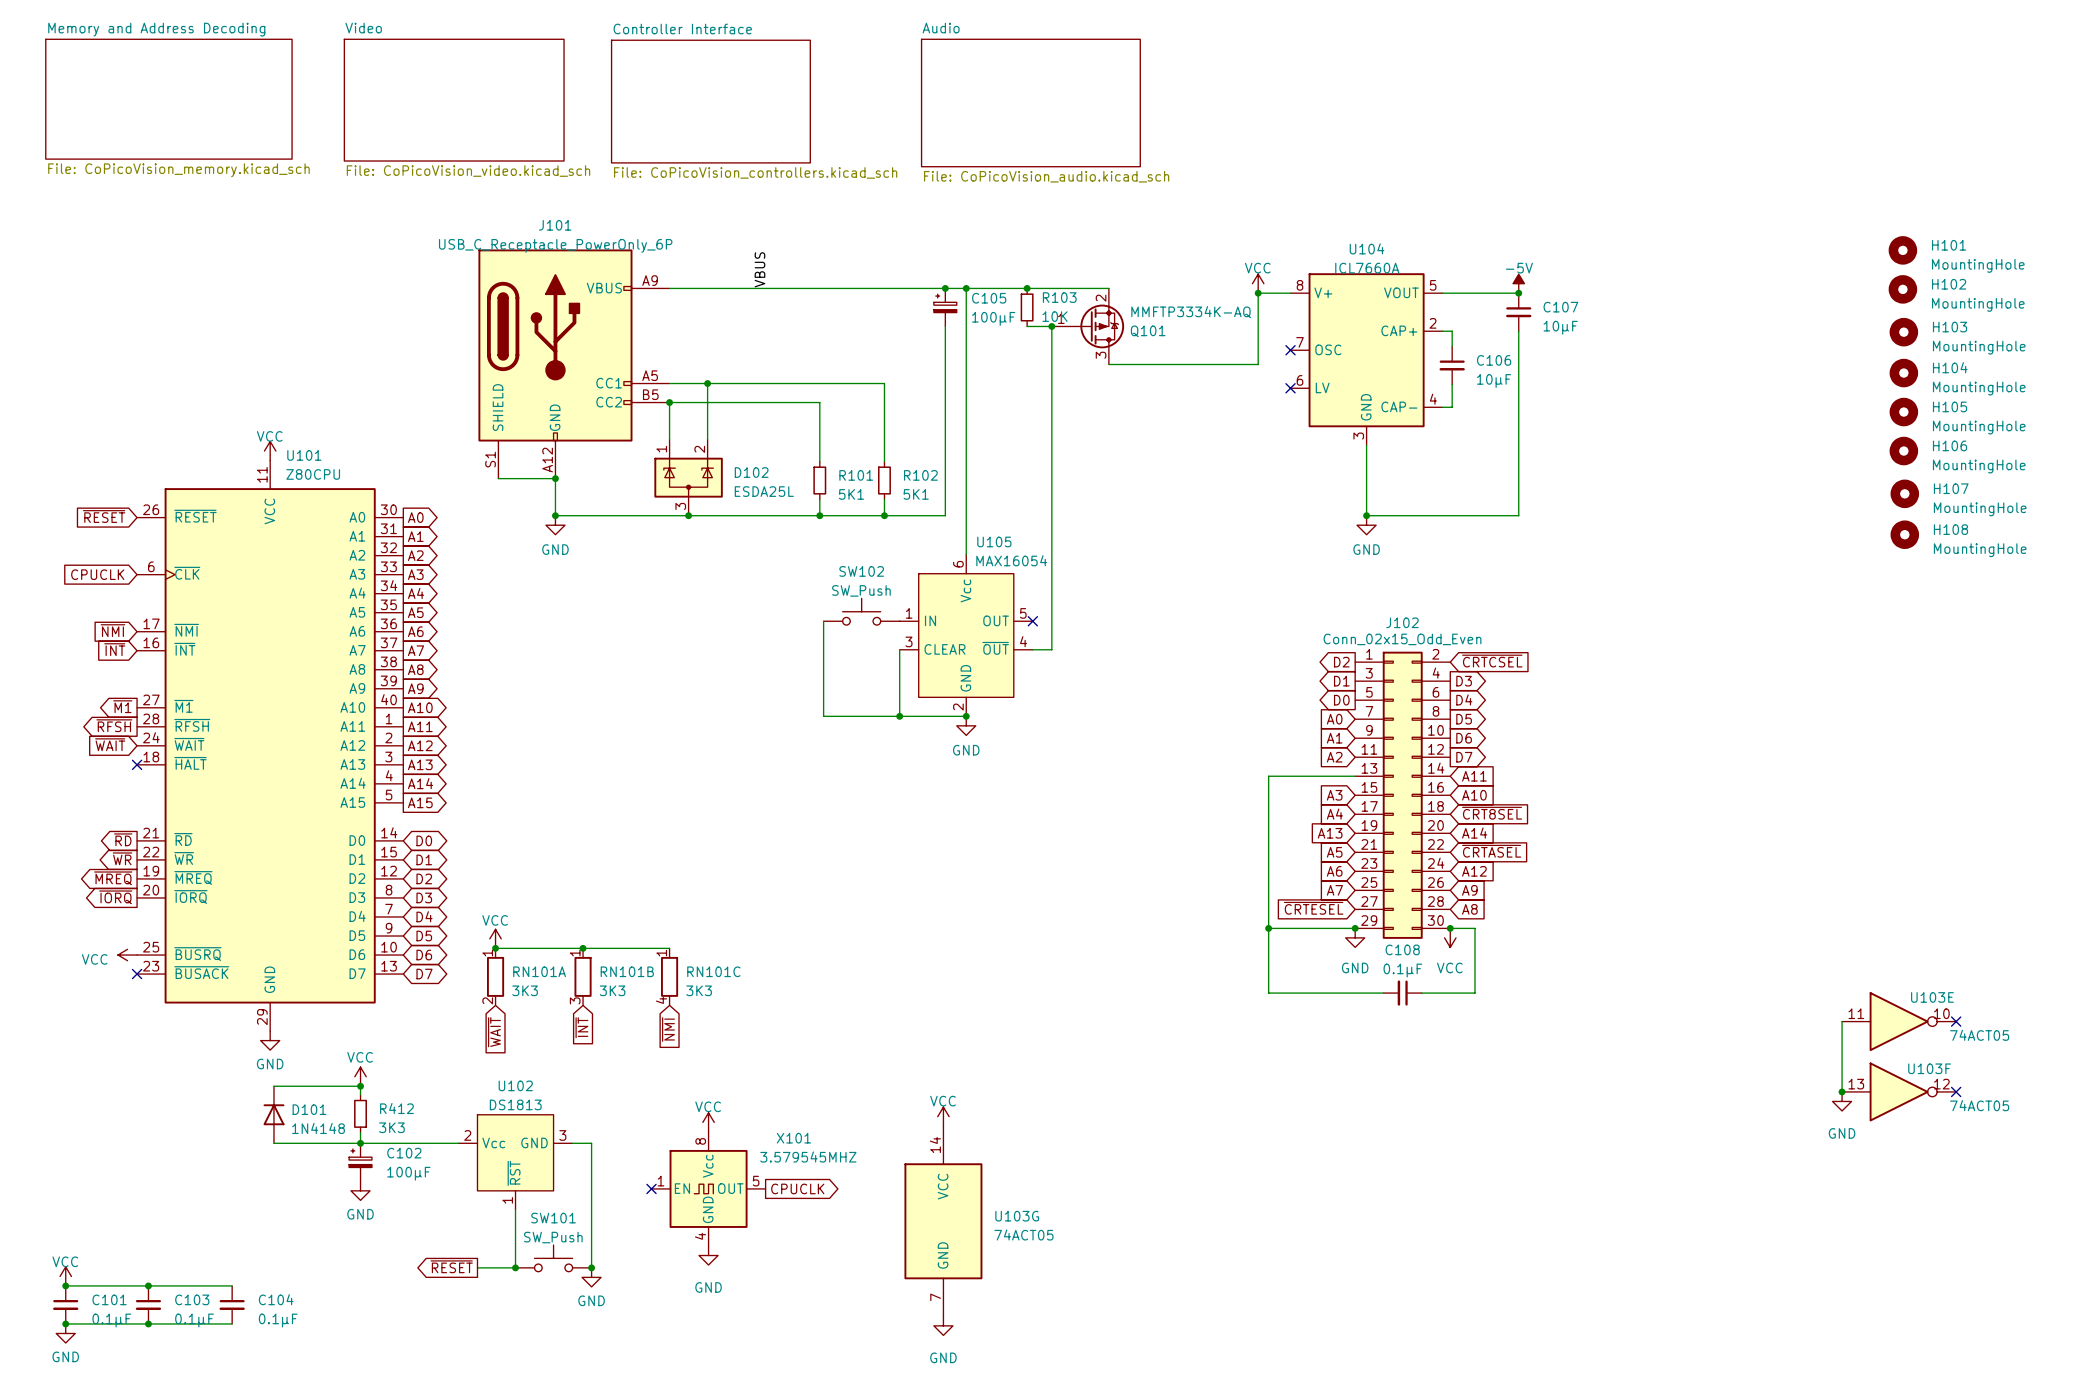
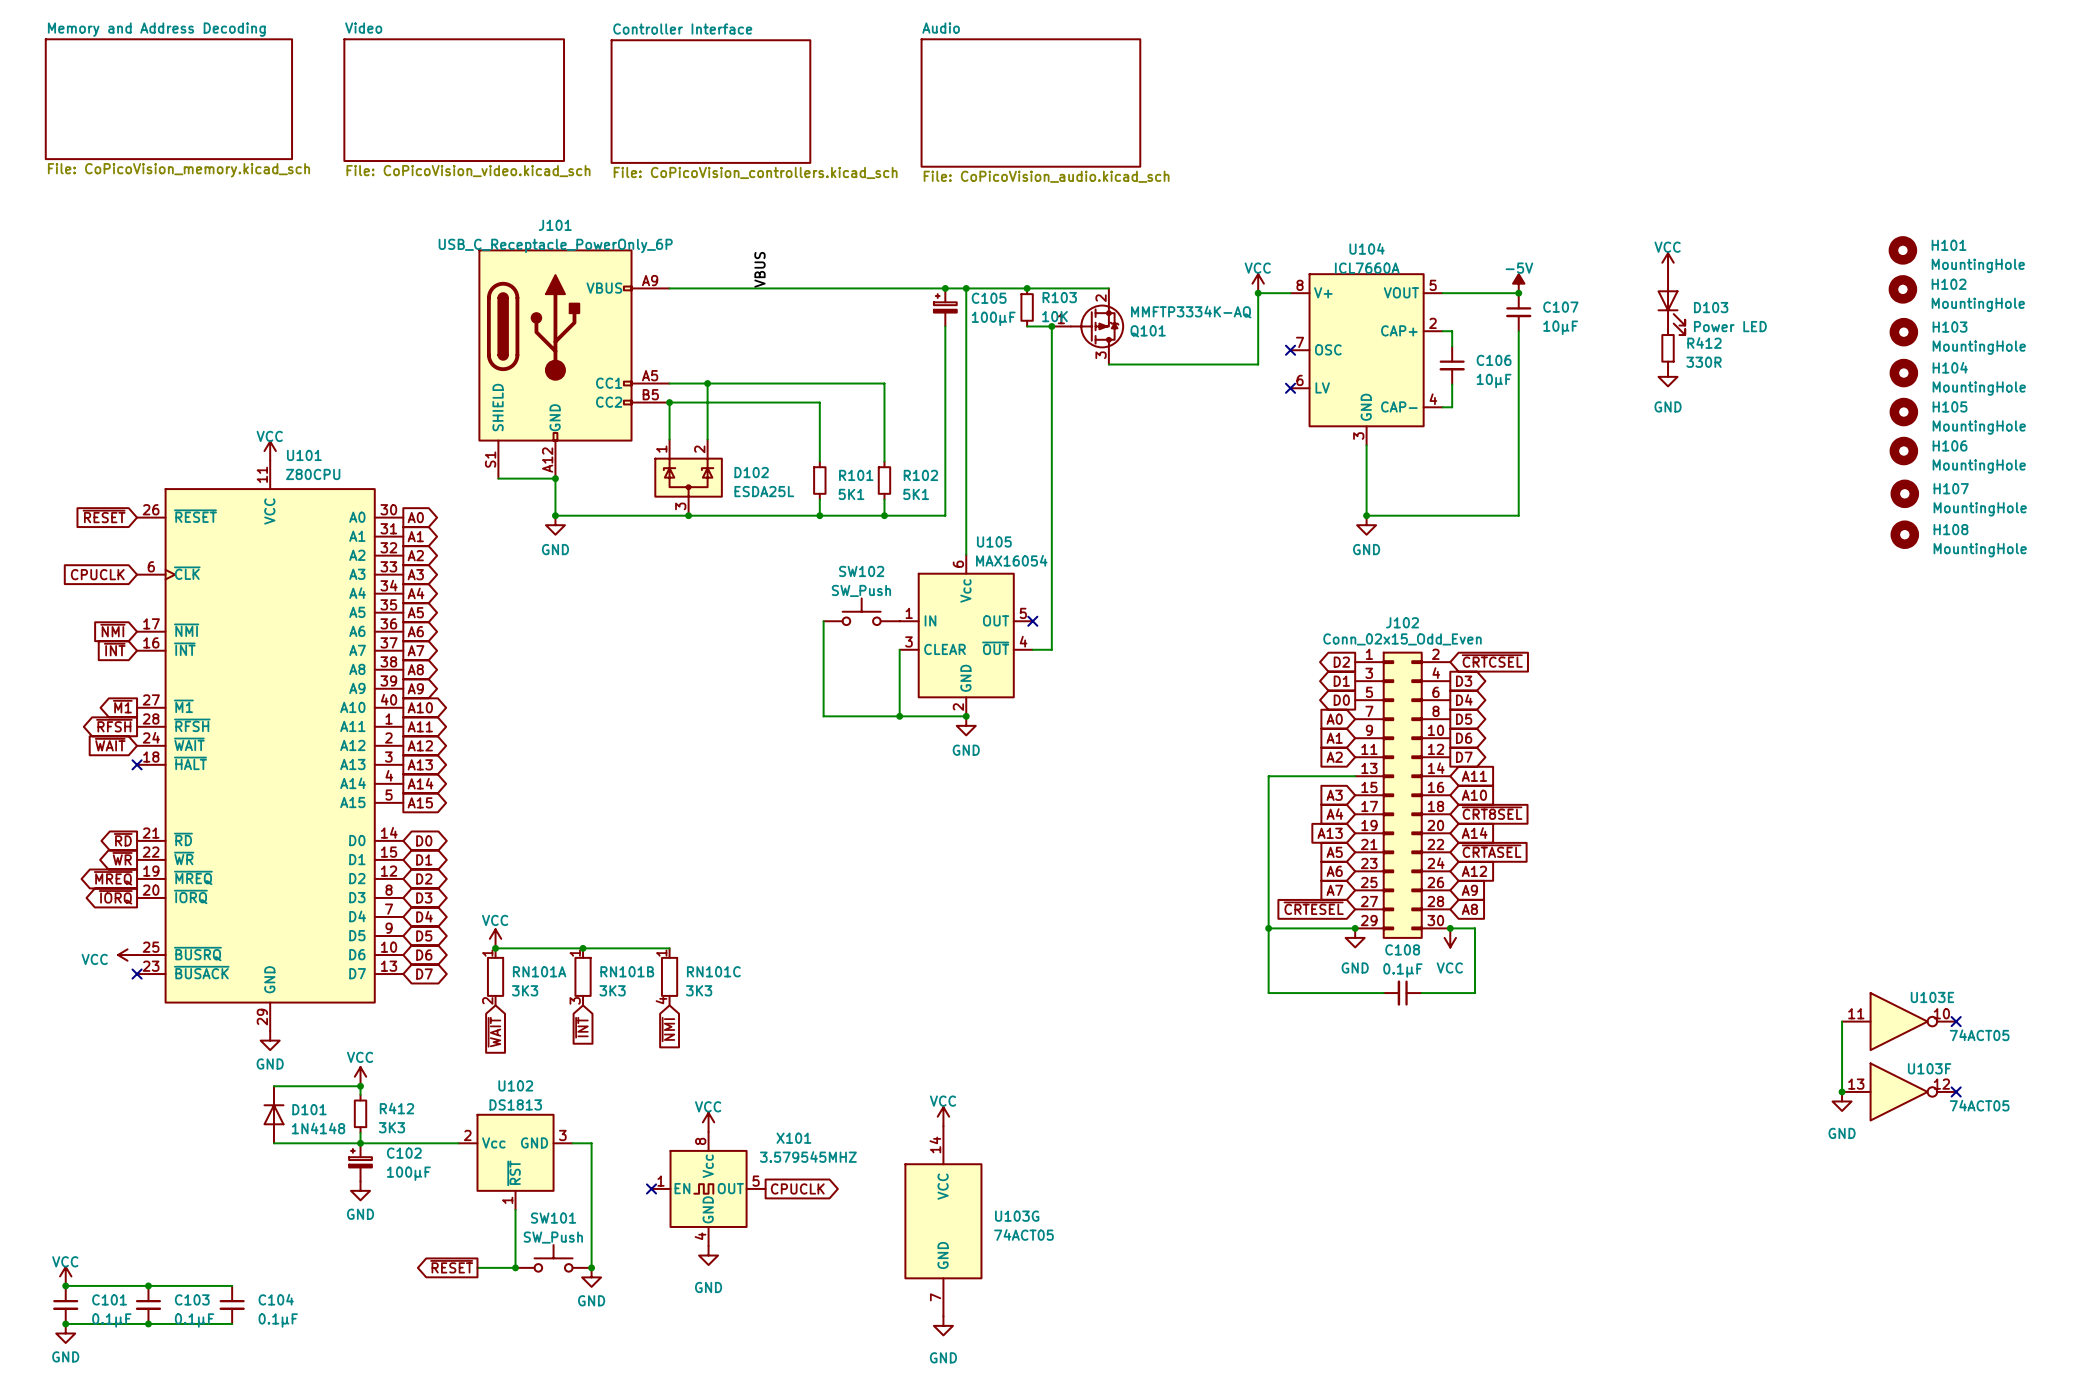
power symbol: none -> VCC (1668, 262)
D103: none -> Power LED (1671, 303)
R412: none -> 330R (1668, 348)
power symbol: none -> GND (1668, 376)

